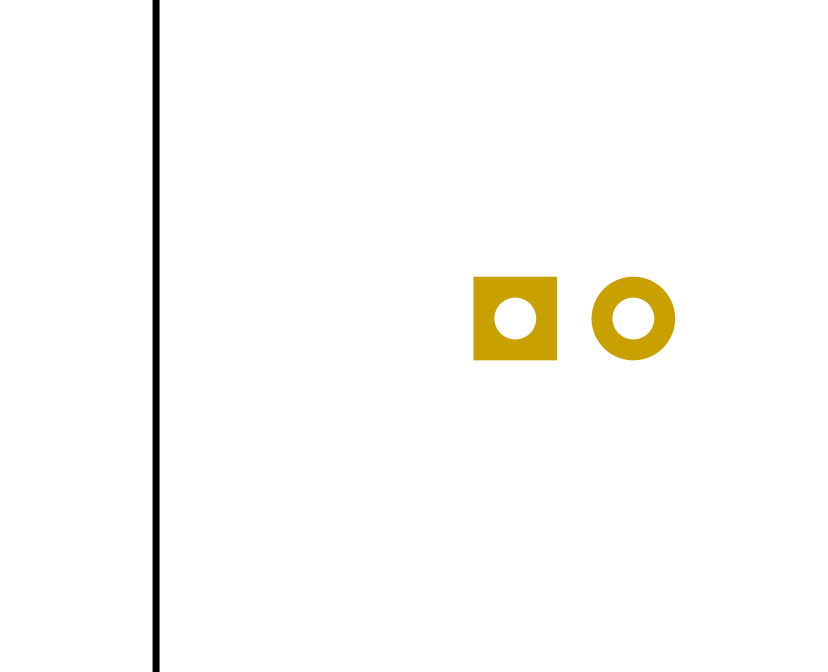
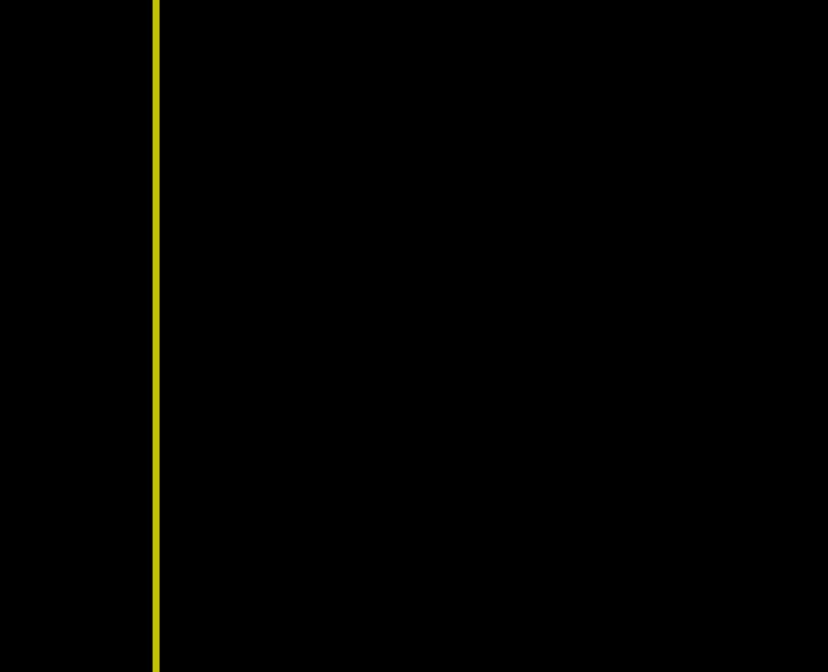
part: (574, 318) -> none

